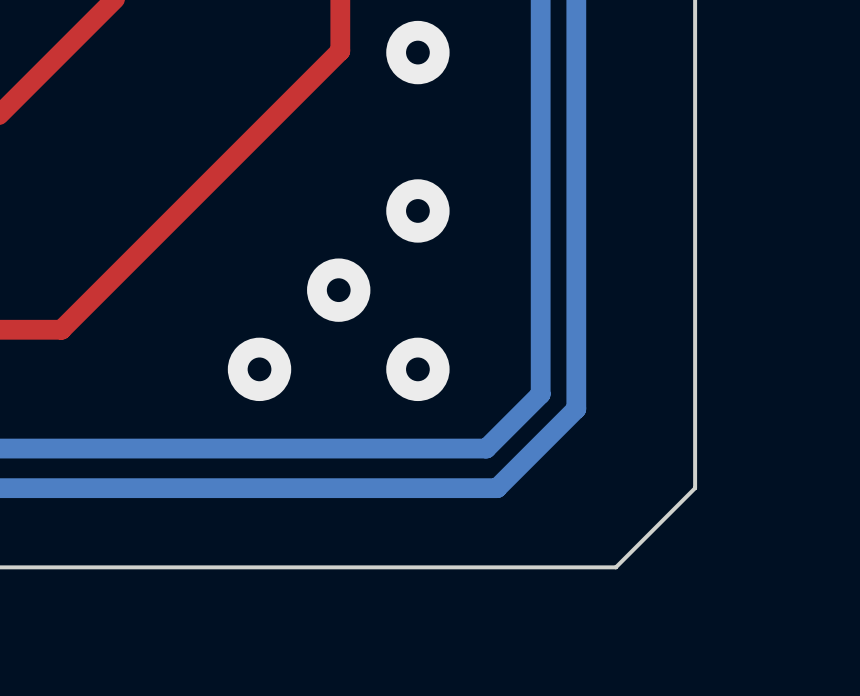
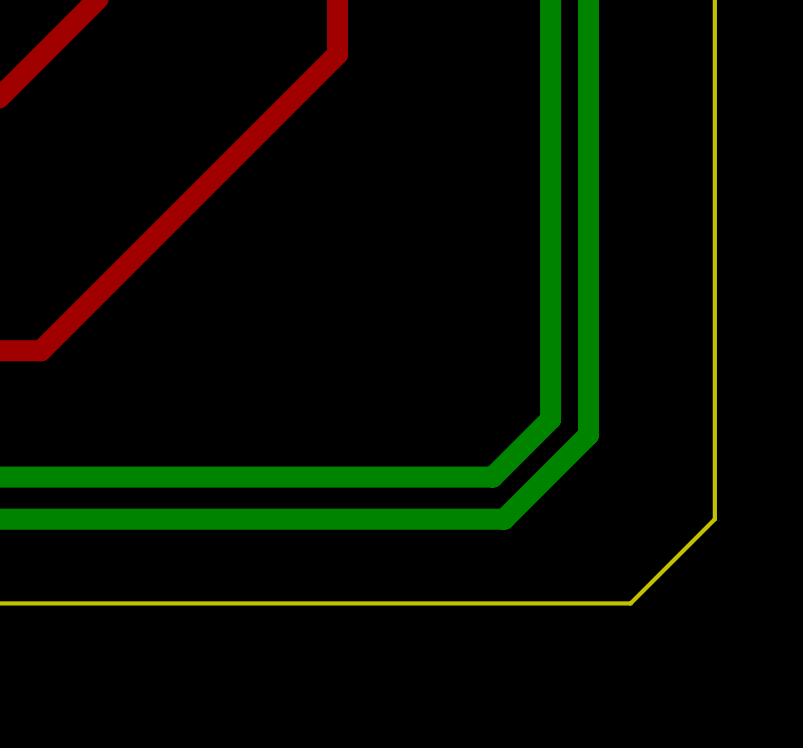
via: (417, 52) -> none
via: (417, 210) -> none
via: (338, 290) -> none
via: (259, 369) -> none
via: (417, 369) -> none

